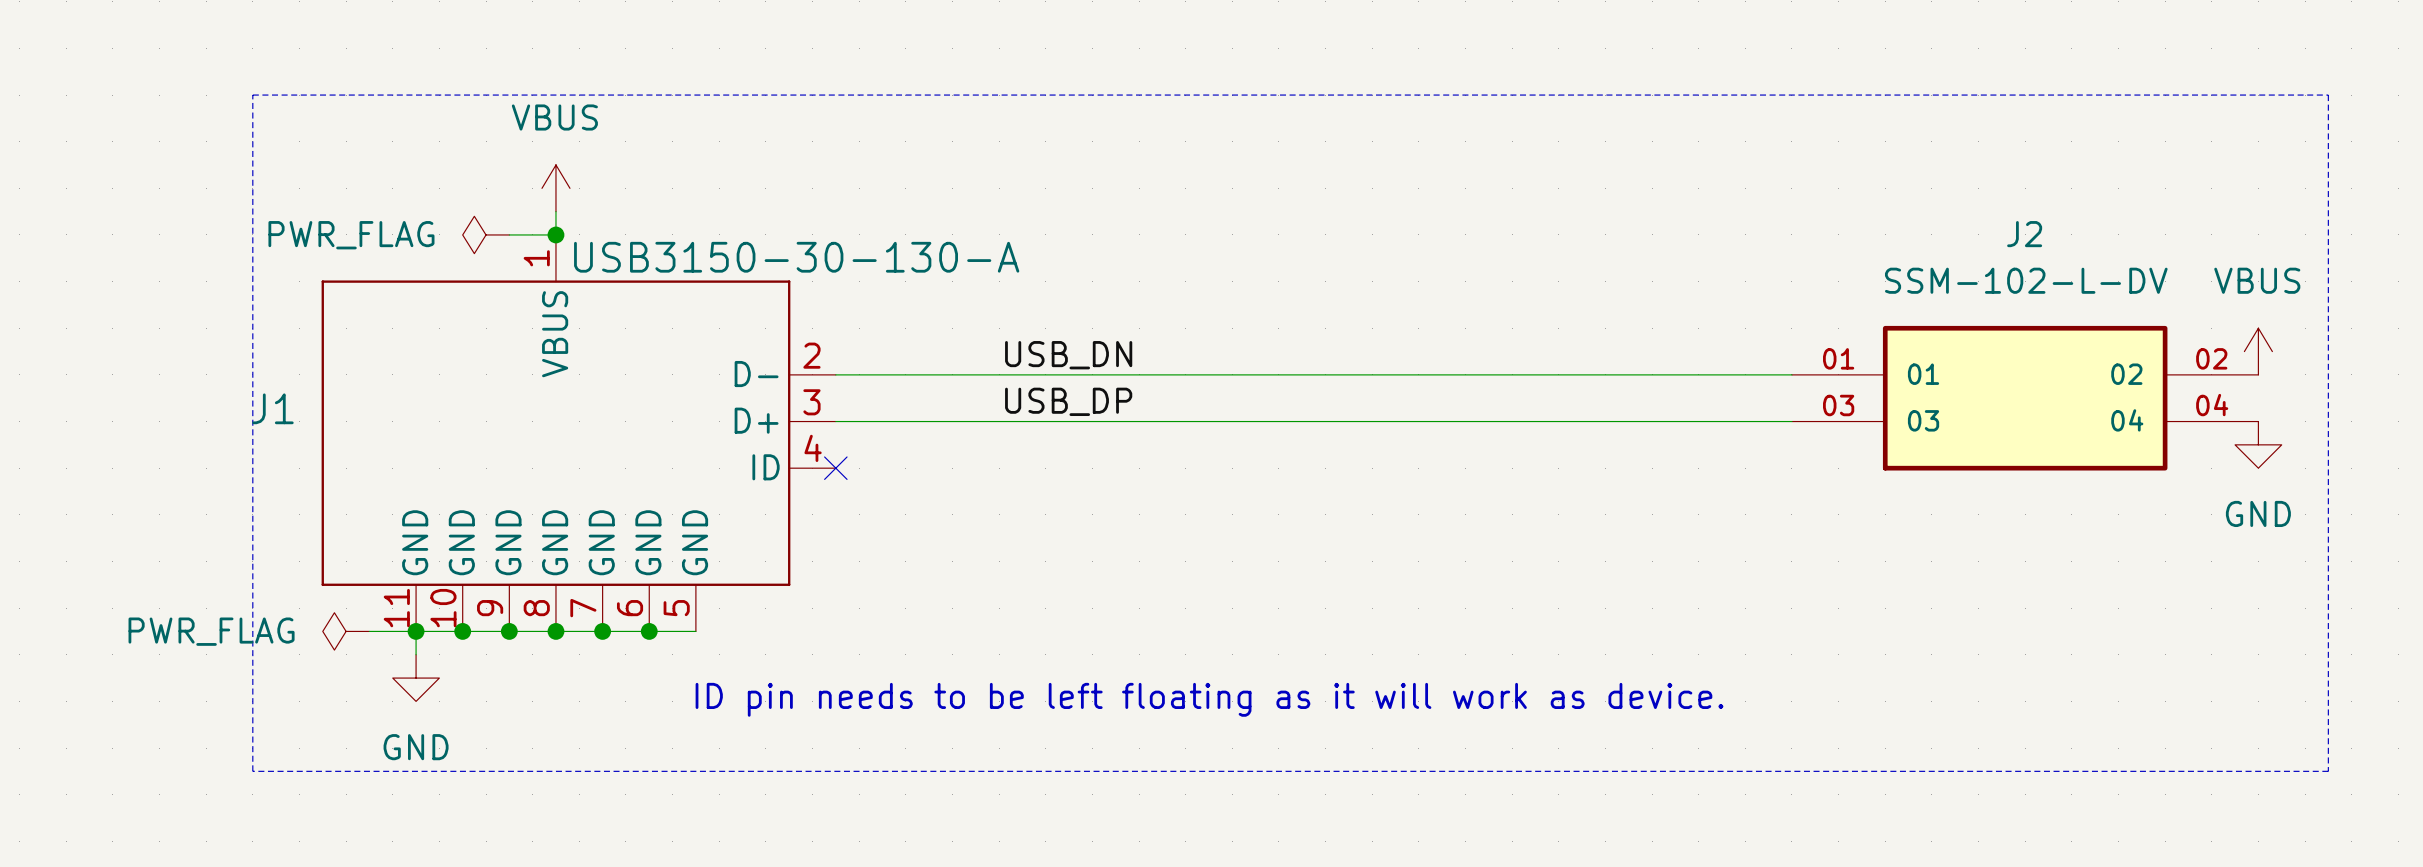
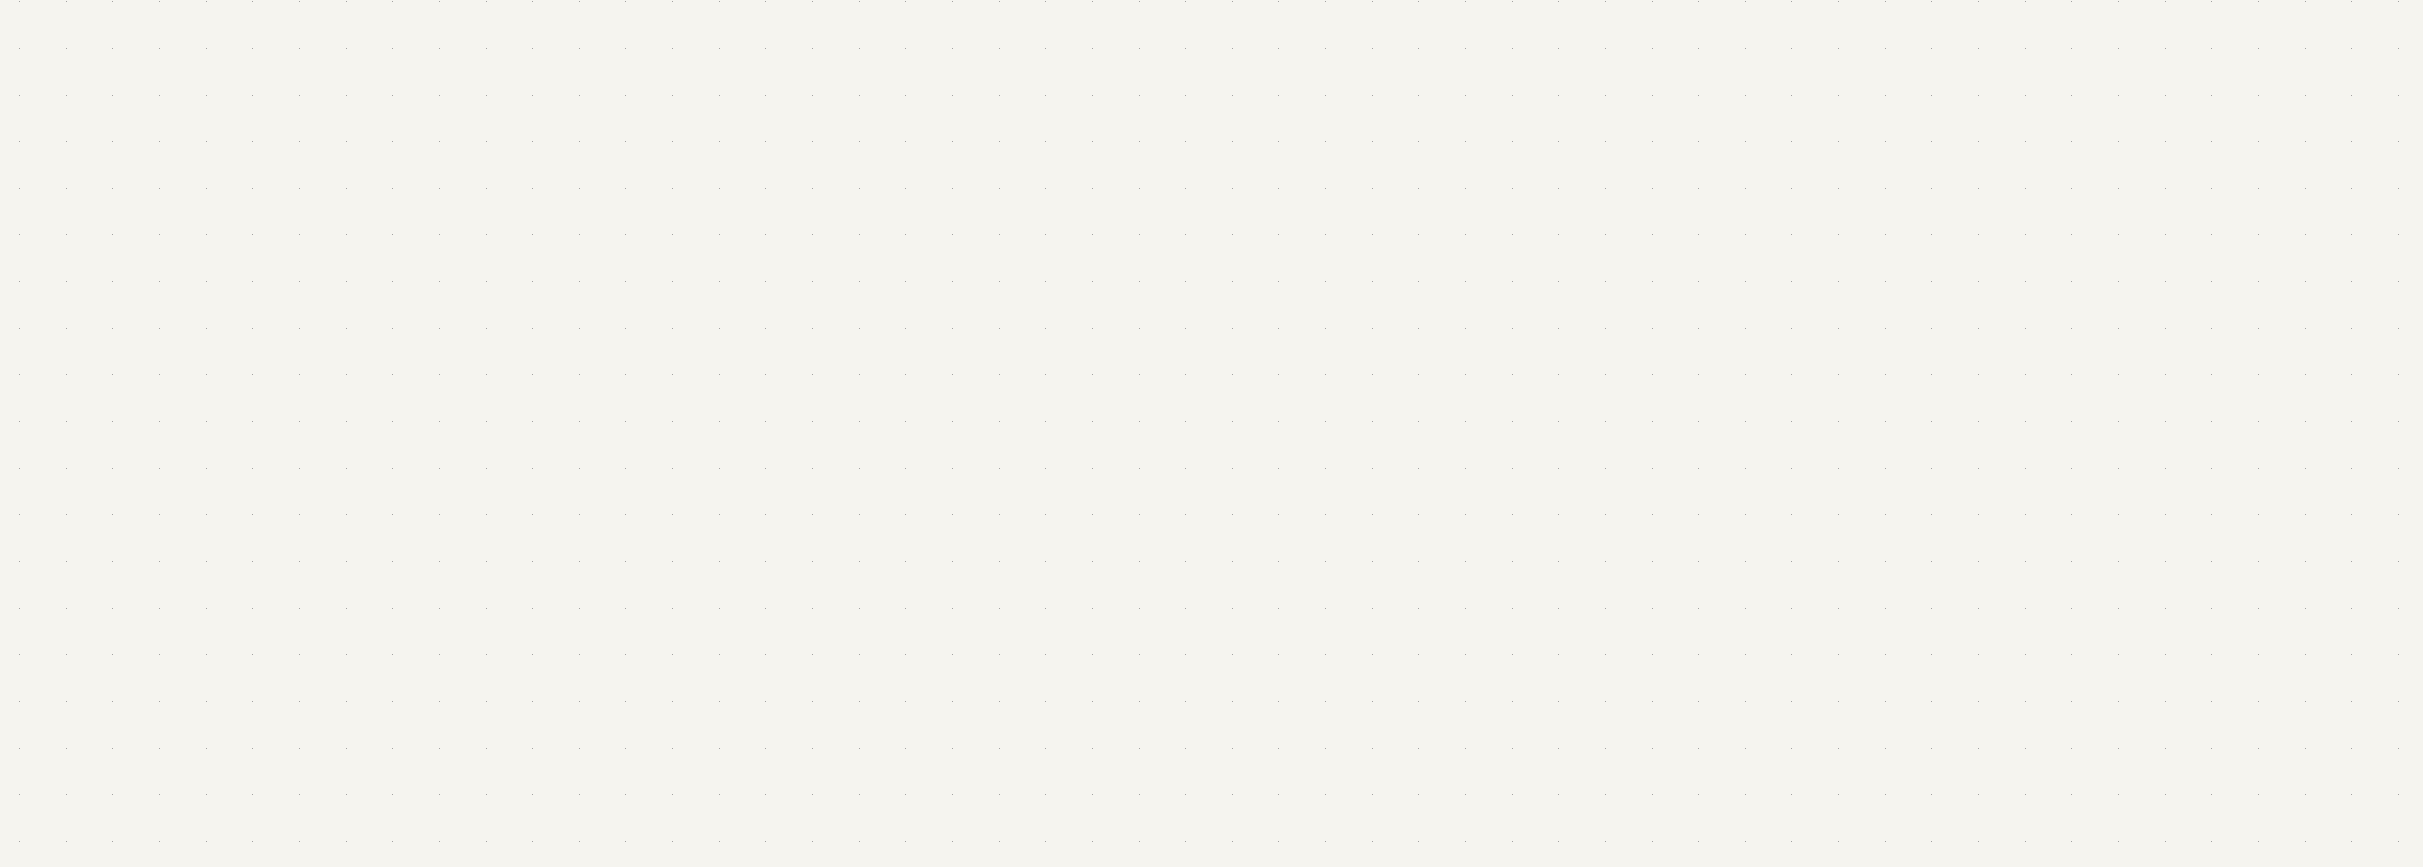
line: (252, 95) (2328, 95) (2328, 771) (252, 771) (252, 95) -> none
power symbol: VBUS (555, 188) -> none
wire: (555, 211) (555, 234) (509, 234) -> none
power symbol: PWR_FLAG (486, 234) -> none
junction: (555, 234) -> none
power symbol: VBUS (2258, 351) -> none
label: USB_DN (1068, 355) -> none
wire: (835, 374) (1791, 374) -> none
J2: SSM-102-L-DV (2025, 398) -> none
label: USB_DP (1068, 401) -> none
wire: (835, 421) (1791, 421) -> none
J1: USB3150-30-130-A (578, 433) -> none
power symbol: GND (2258, 444) -> none
no-connect mark: (835, 468) -> none
power symbol: PWR_FLAG (346, 631) -> none
wire: (369, 631) (695, 631) -> none
wire: (416, 631) (416, 654) -> none
junction: (416, 631) -> none
junction: (462, 631) -> none
junction: (509, 631) -> none
junction: (555, 631) -> none
junction: (602, 631) -> none
junction: (649, 631) -> none
power symbol: GND (416, 678) -> none
text: ID pin needs to be left floating as it will work as device. (1209, 699) -> none

